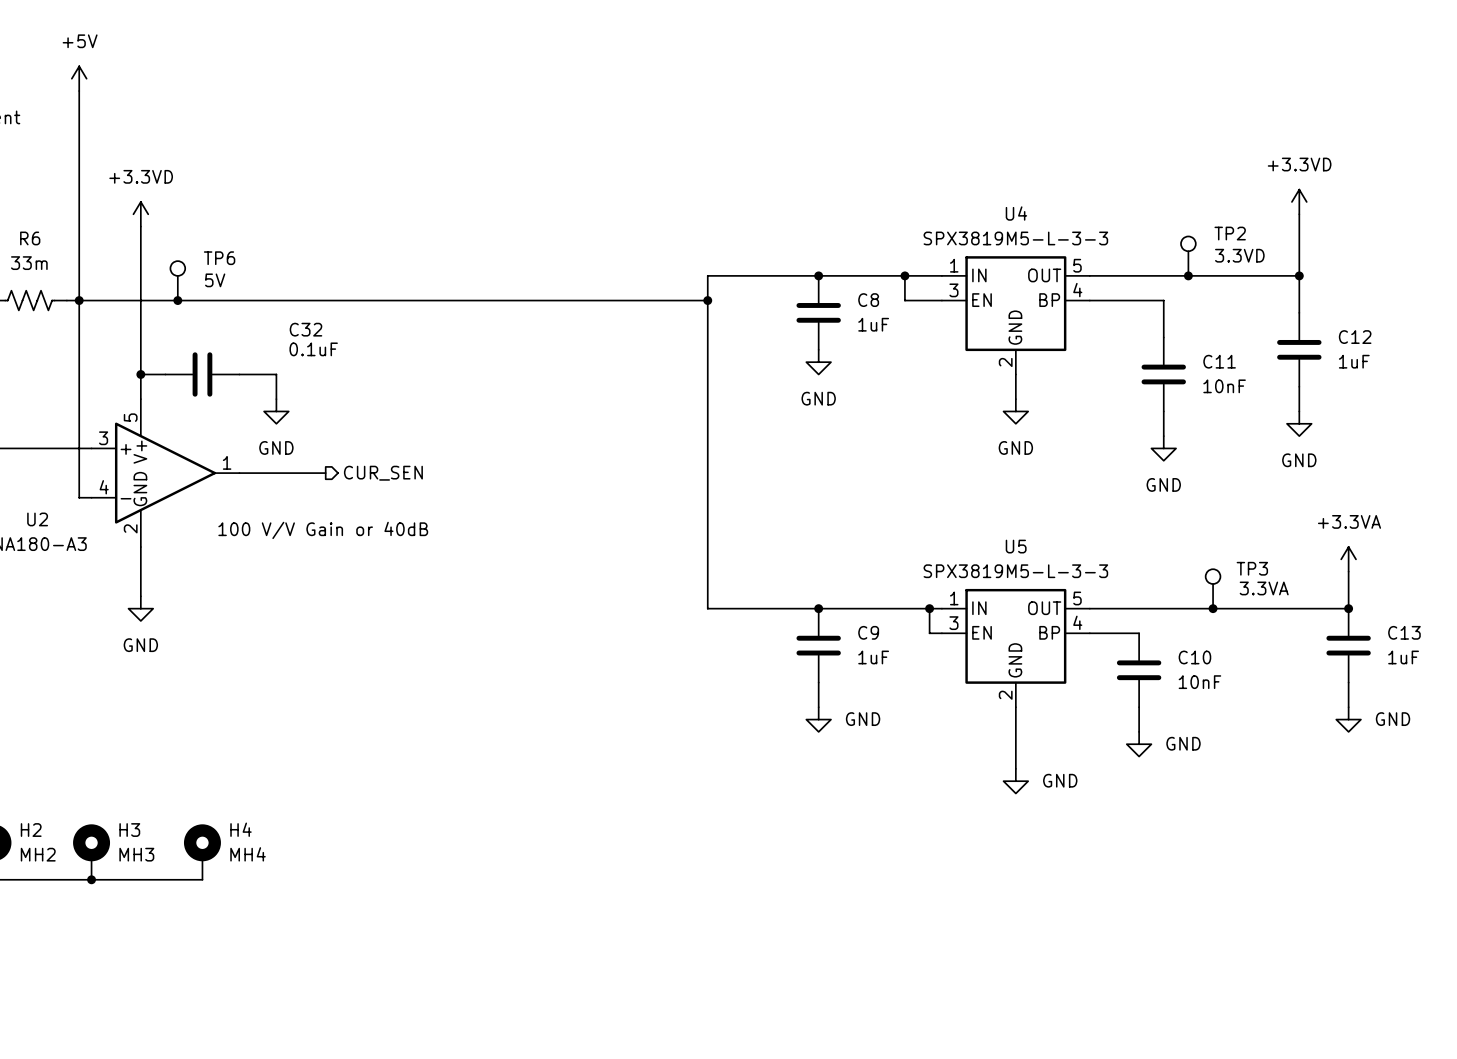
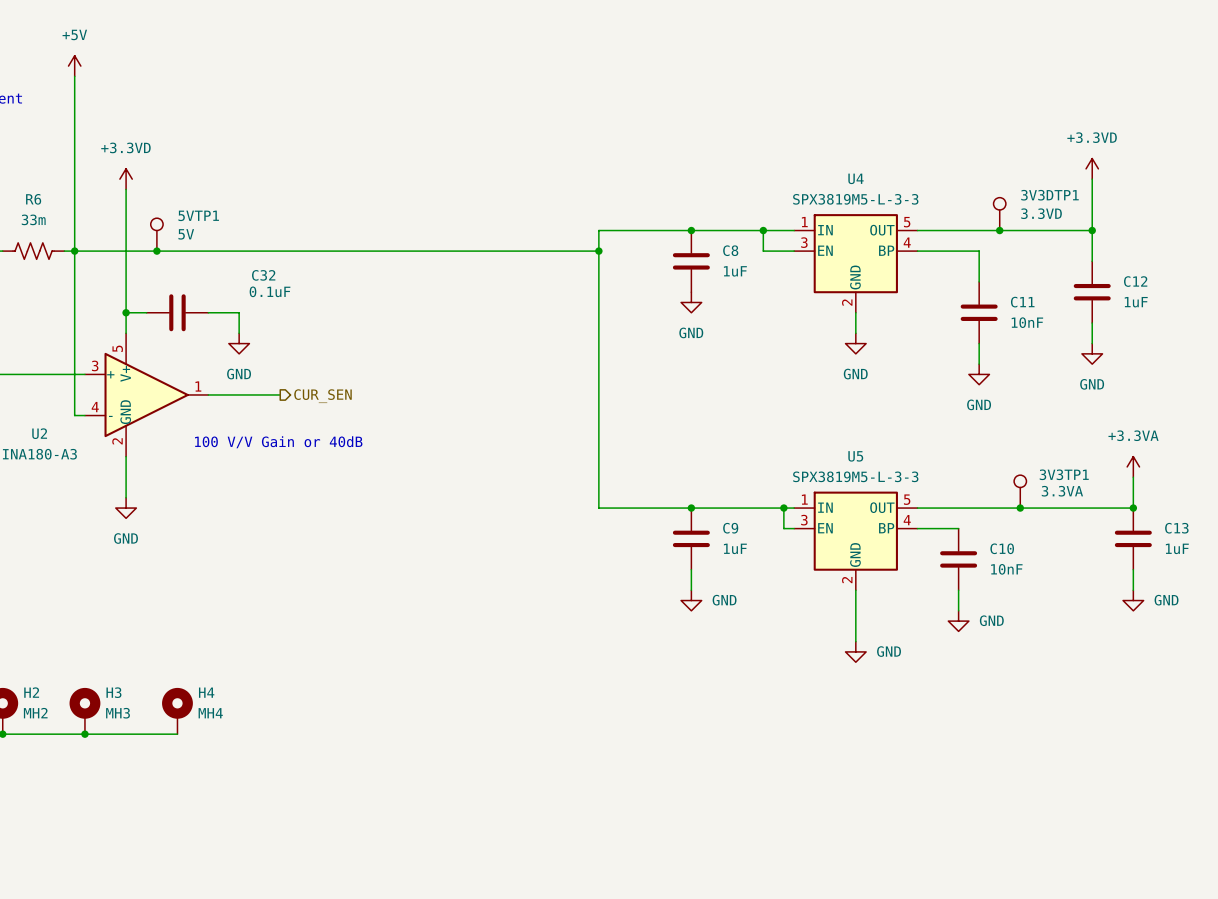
TP2 name: TP2 (1230, 233) -> 3V3DTP1 (1049, 195)
TP6 name: TP6 (219, 258) -> 5VTP1 (198, 215)
TP3 name: TP3 (1252, 568) -> 3V3TP1 (1064, 474)

